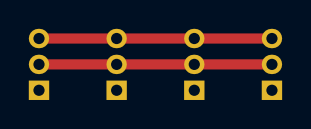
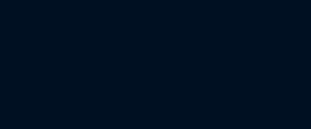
top track: (271, 38) (38, 38) -> none
part: (38, 64) -> none
part: (116, 64) -> none
part: (194, 64) -> none
top track: (271, 64) (38, 64) -> none
part: (271, 64) -> none

